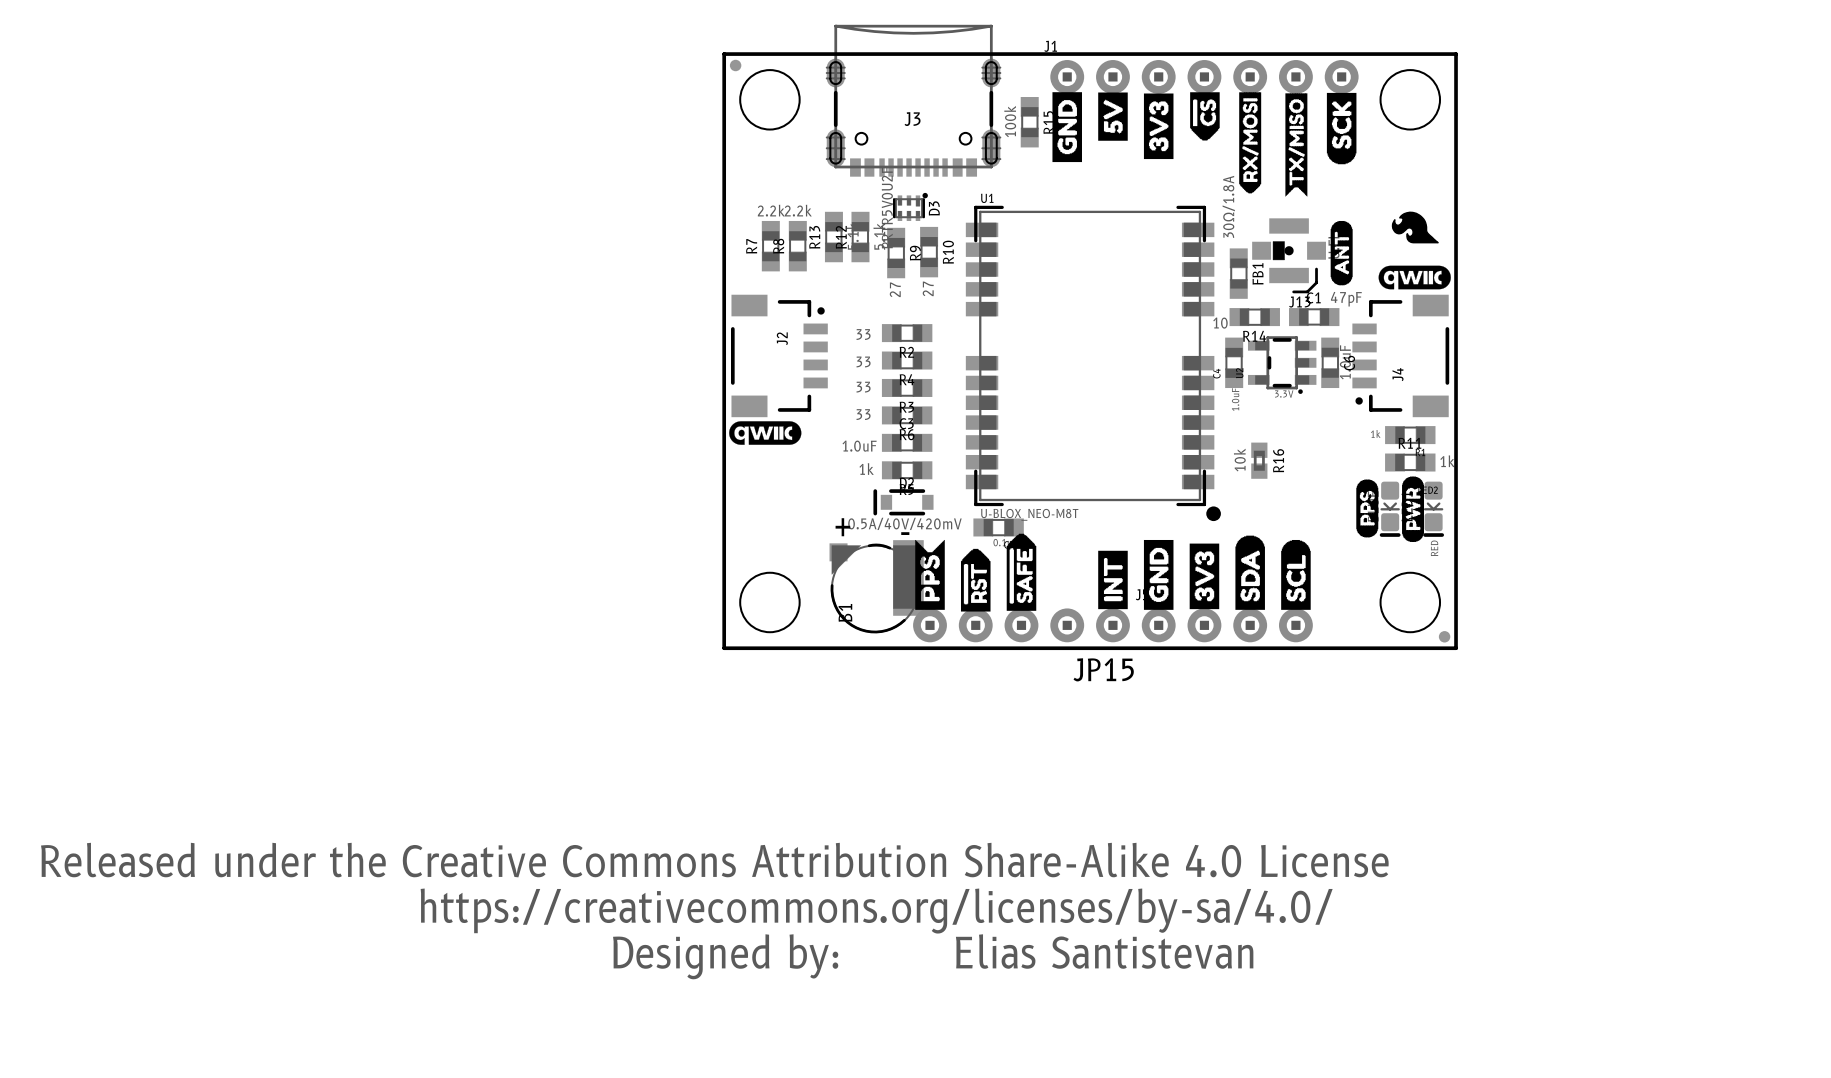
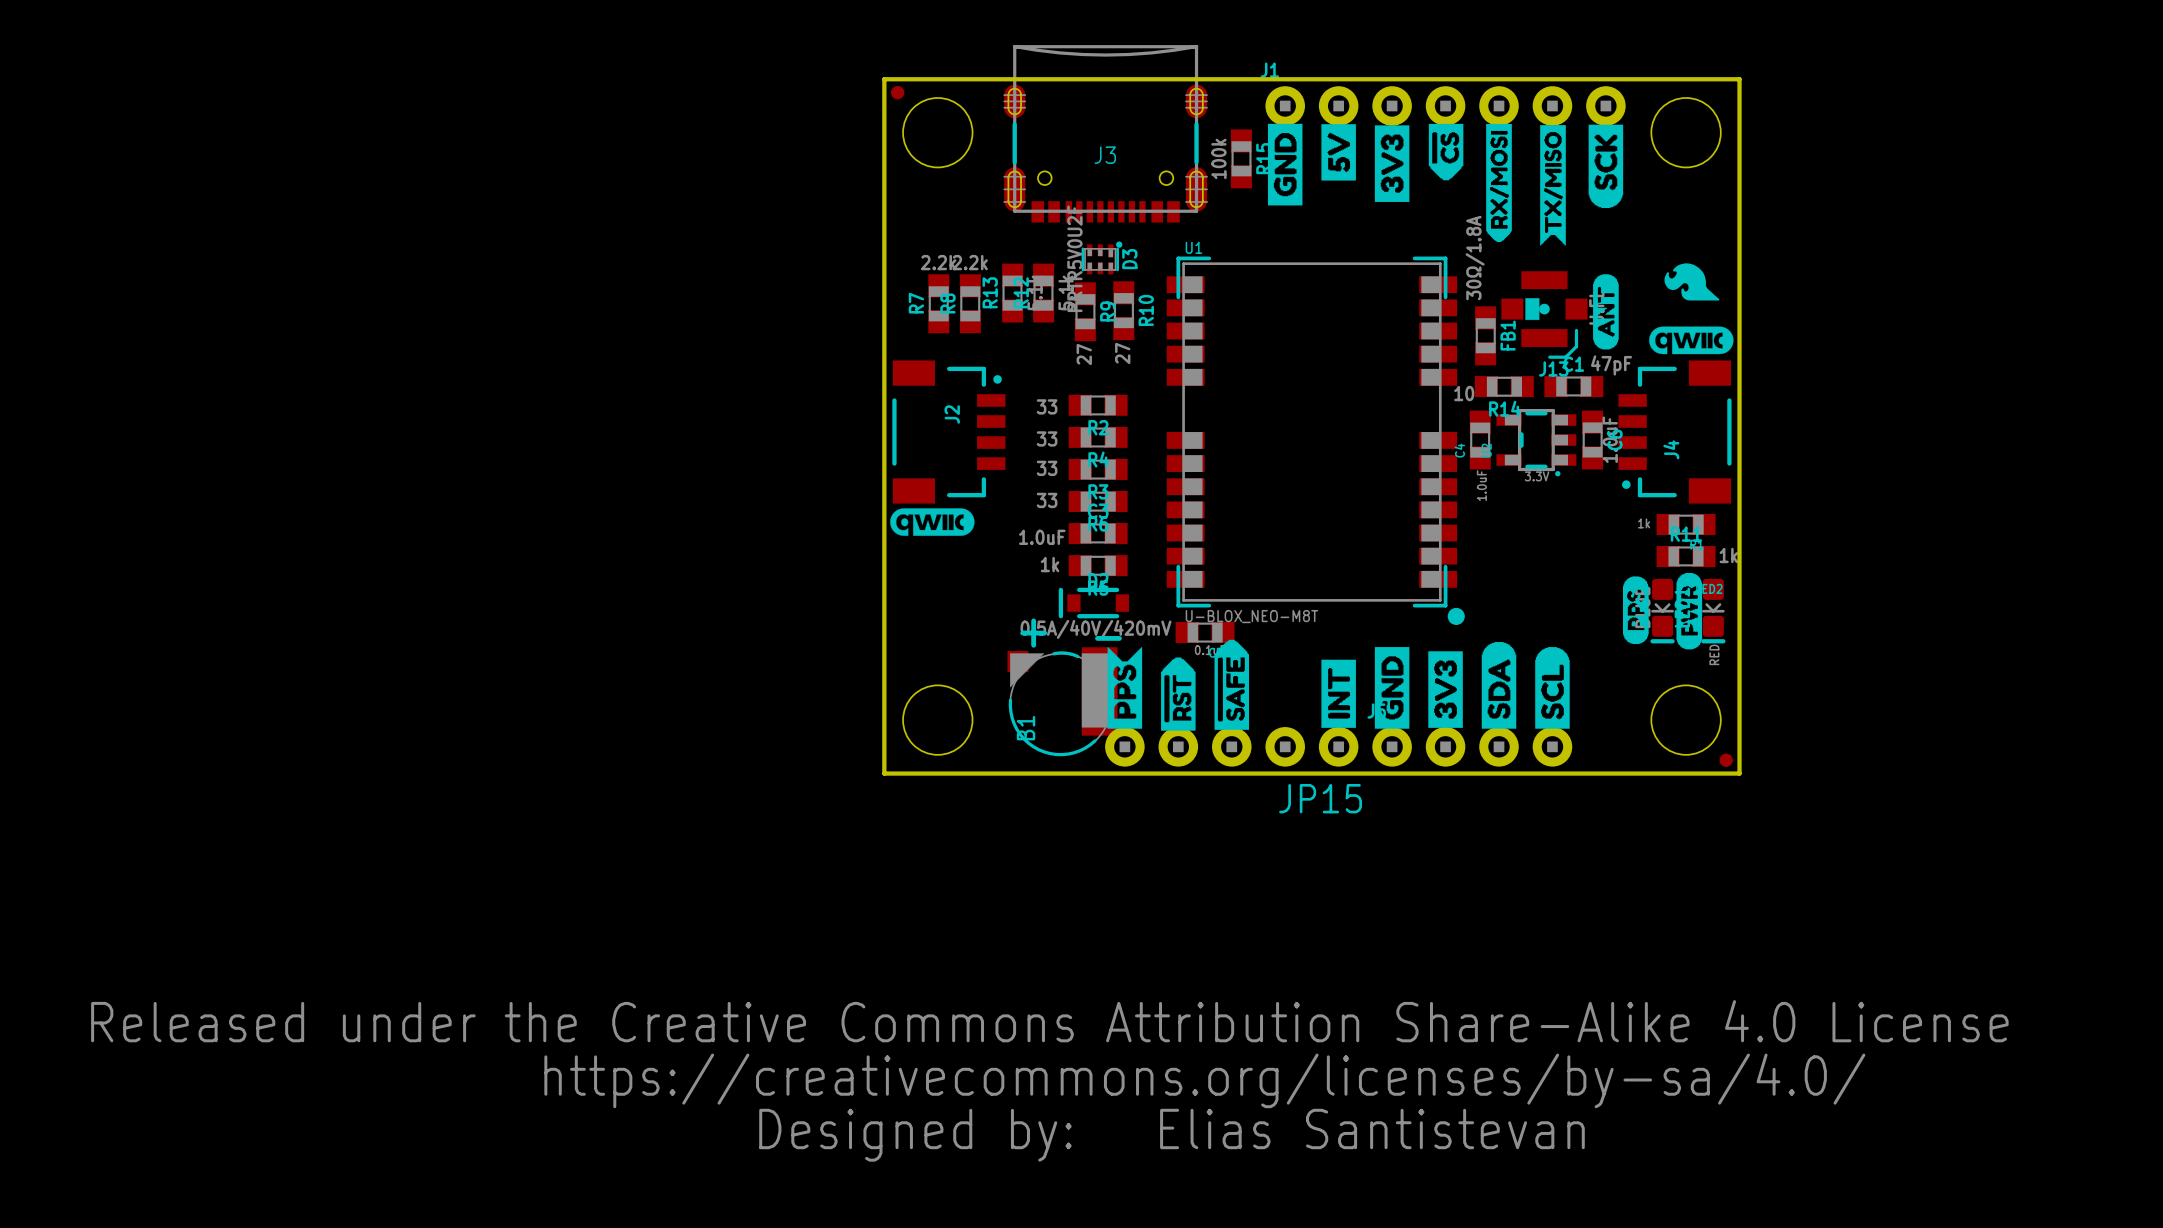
R16: 10k (1259, 460) -> none

